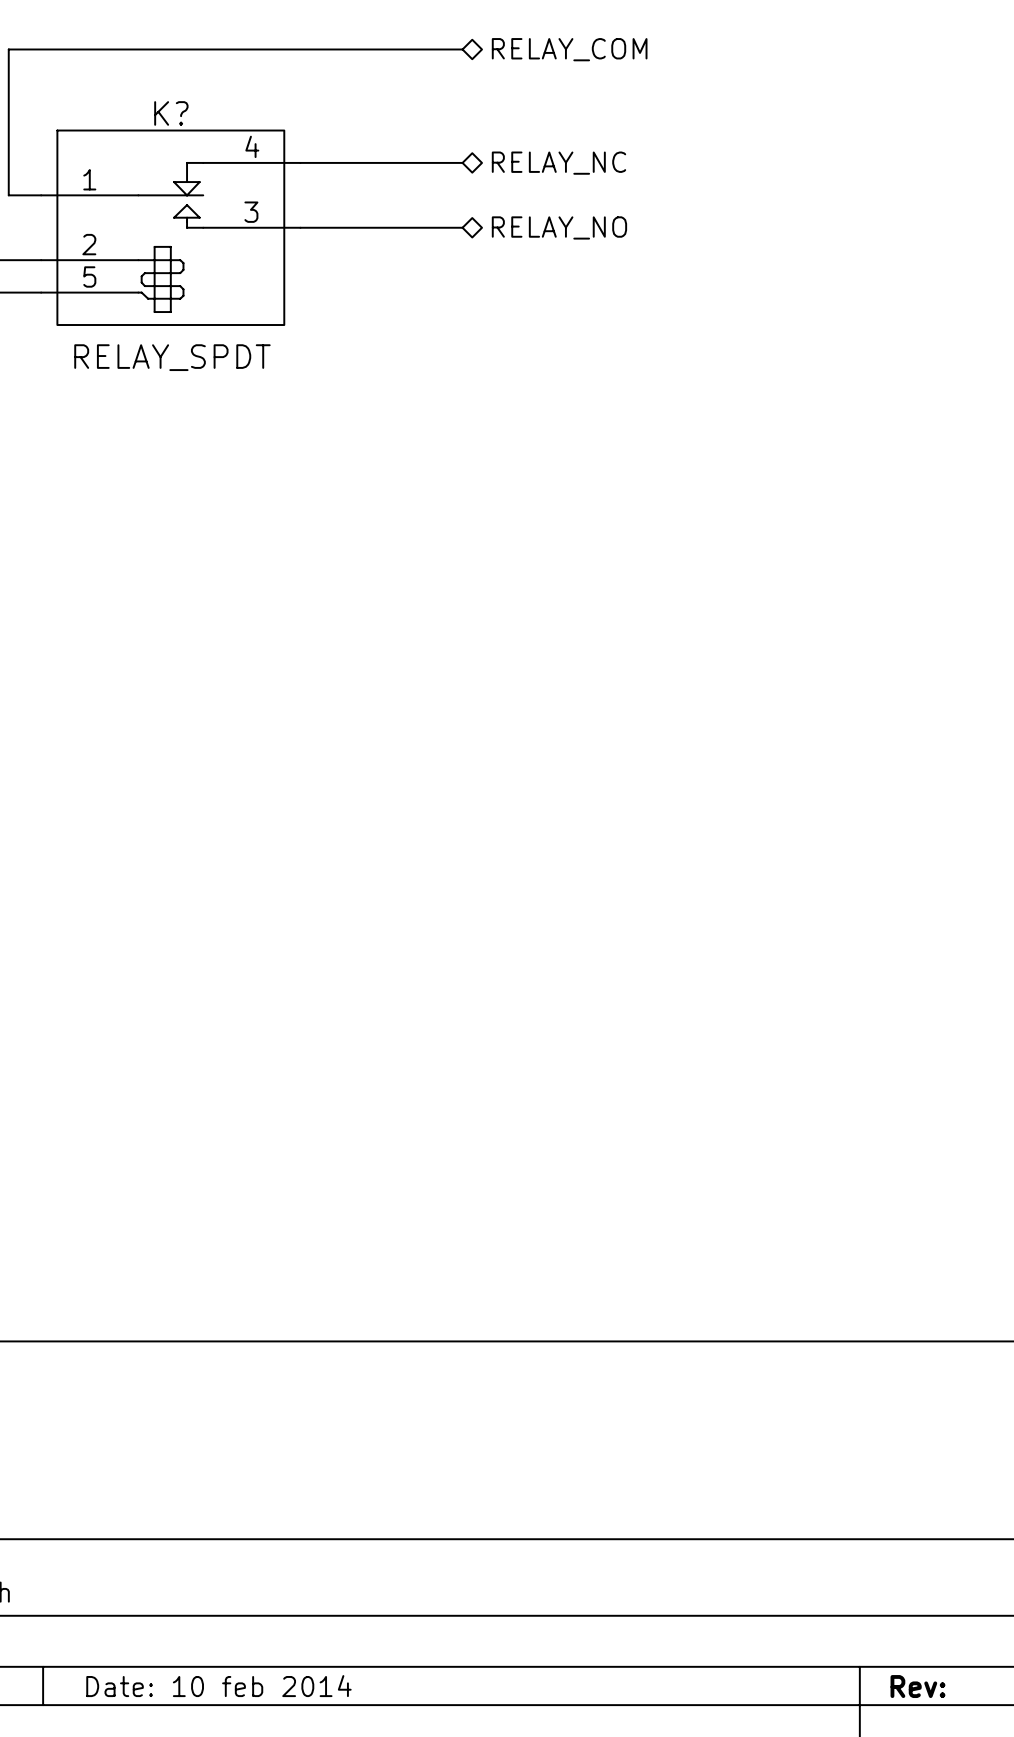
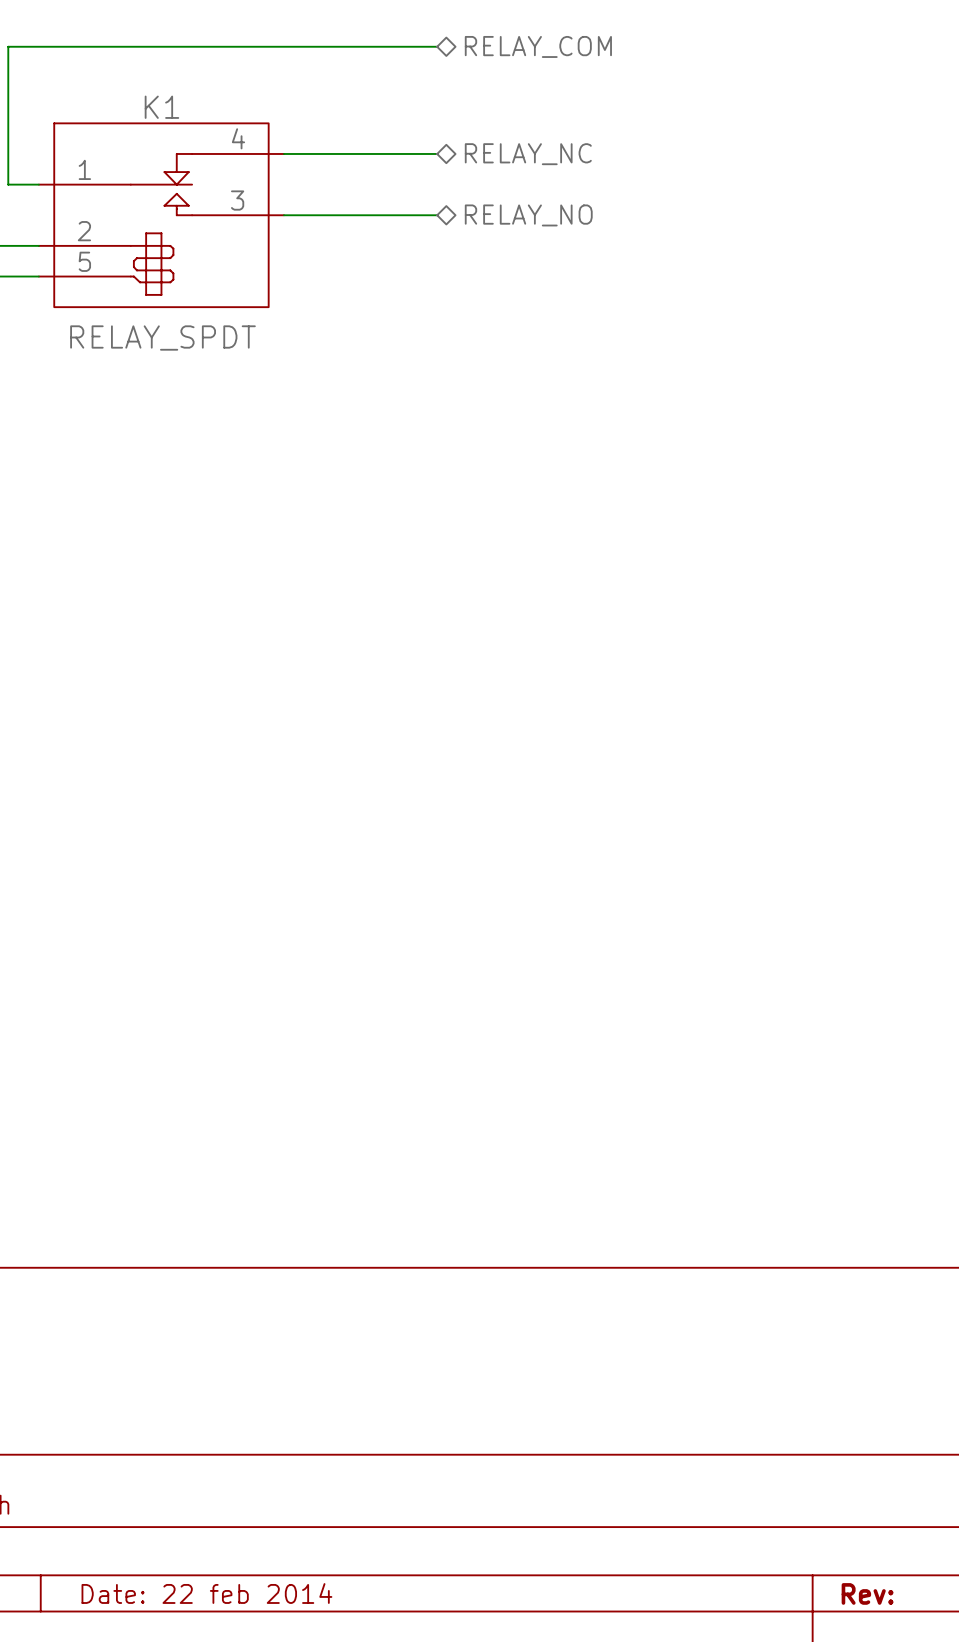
K? name: K? (171, 113) -> K1 (161, 107)
title block: Date: 10 feb 2014 (218, 1686) -> Date: 22 feb 2014 (206, 1593)

